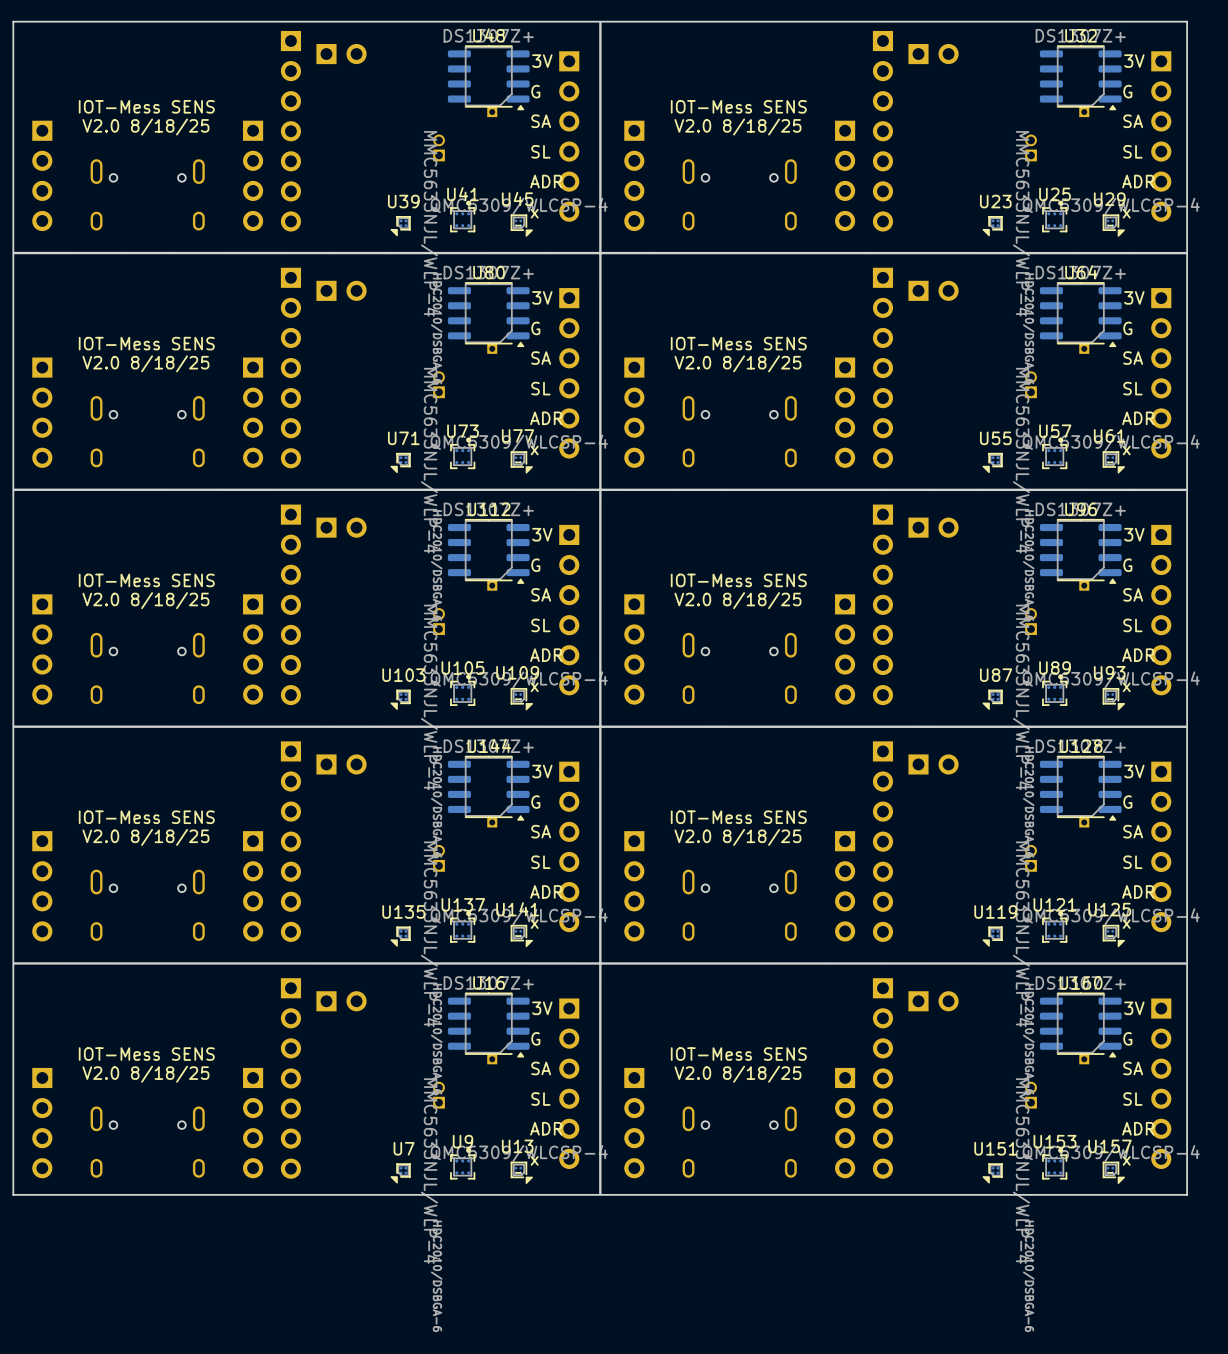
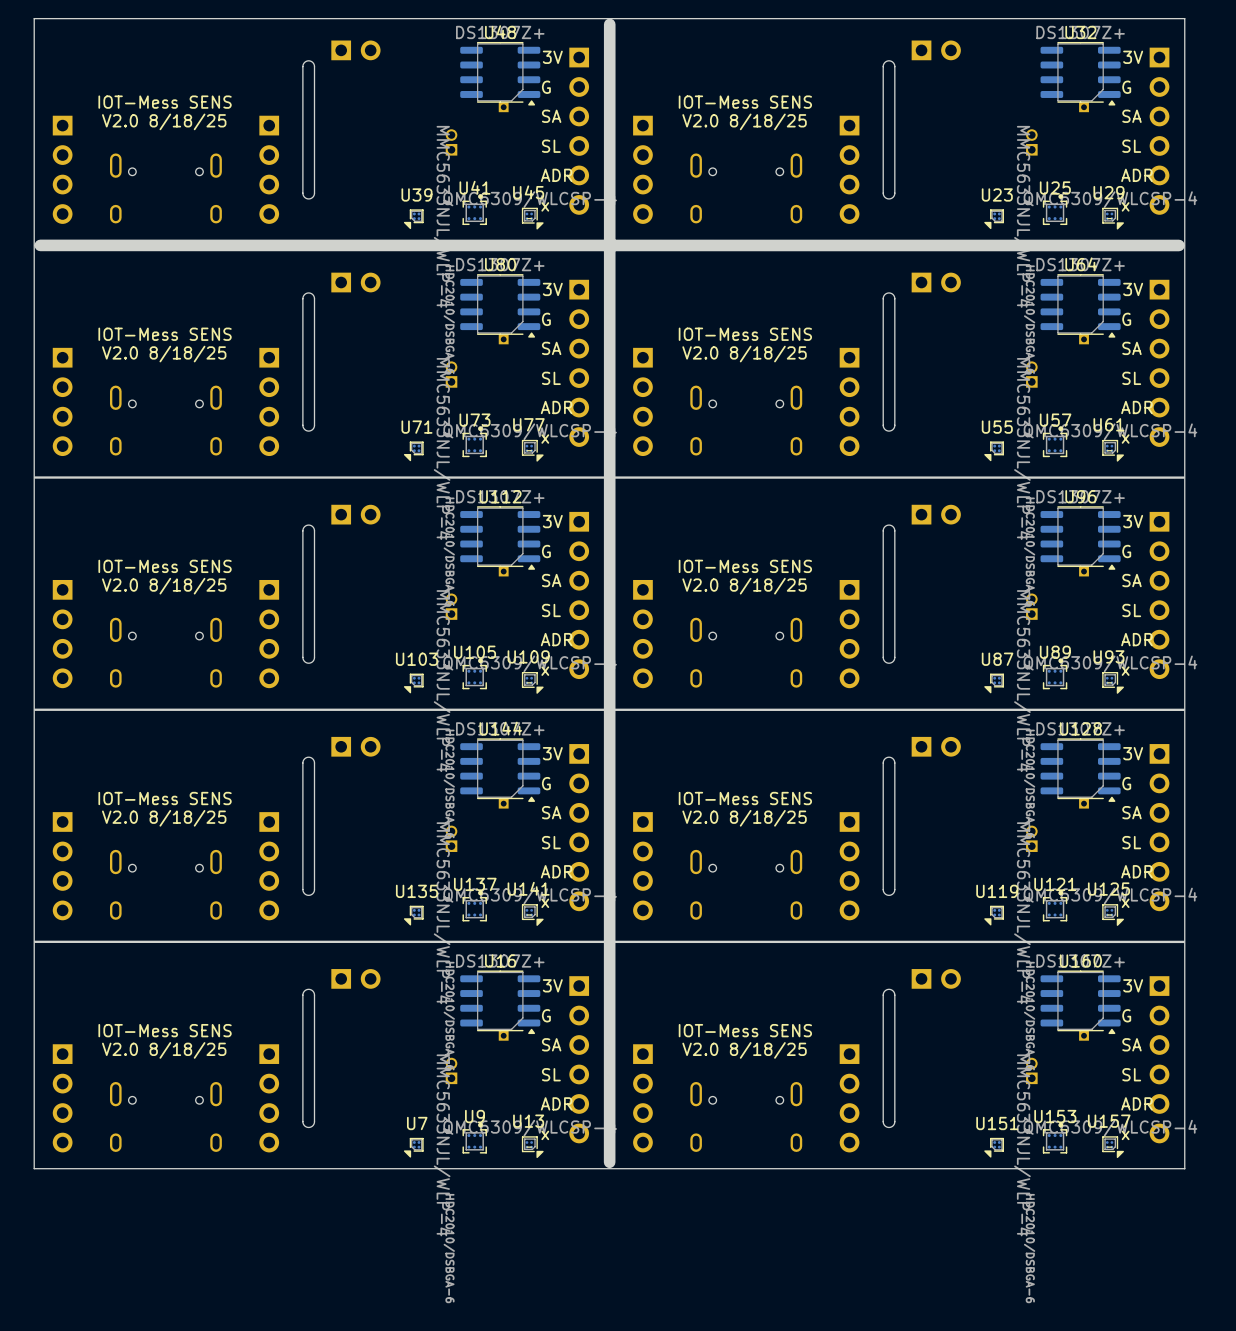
board edge width: thin (600, 22) (600, 1193) -> thick (609, 19) (609, 1167)
board edge: none -> (314, 66) (314, 193) (312, 197) (308, 198) (304, 196) (302, 193) (302, 66) (304, 62) (308, 60) (312, 62) (314, 66)
board edge: none -> (894, 66) (894, 193) (893, 197) (889, 198) (884, 197) (883, 193) (883, 66) (884, 62) (889, 60) (893, 62) (894, 66)
part: (290, 131) -> none
part: (882, 131) -> none
board edge width: thin (14, 253) (1186, 253) -> thick (35, 245) (1183, 245)
board edge: none -> (314, 298) (314, 425) (313, 429) (308, 431) (304, 429) (302, 425) (302, 298) (304, 294) (308, 292) (312, 294) (314, 298)
board edge: none -> (894, 298) (894, 425) (893, 429) (889, 431) (884, 429) (883, 425) (883, 298) (884, 294) (889, 292) (893, 294) (894, 298)
part: (290, 368) -> none
part: (882, 368) -> none
board edge: none -> (314, 530) (314, 657) (313, 661) (308, 663) (304, 661) (302, 657) (302, 530) (304, 527) (308, 525) (312, 526) (314, 530)
board edge: none -> (894, 530) (894, 657) (893, 661) (889, 663) (885, 661) (883, 657) (883, 530) (884, 526) (889, 525) (893, 526) (894, 530)
part: (290, 604) -> none
part: (882, 604) -> none
board edge: none -> (314, 763) (314, 889) (313, 893) (308, 895) (304, 893) (302, 889) (302, 763) (304, 758) (308, 757) (312, 758) (314, 763)
board edge: none -> (894, 763) (894, 889) (893, 893) (889, 895) (884, 893) (883, 889) (883, 763) (884, 758) (889, 757) (893, 758) (894, 763)
part: (290, 841) -> none
part: (882, 841) -> none
board edge: none -> (314, 995) (314, 1121) (313, 1125) (308, 1127) (304, 1125) (302, 1121) (302, 995) (304, 991) (308, 989) (312, 990) (314, 995)
board edge: none -> (894, 995) (894, 1121) (893, 1125) (889, 1127) (884, 1125) (883, 1121) (883, 995) (884, 991) (889, 989) (893, 991) (894, 995)
part: (290, 1078) -> none
part: (882, 1078) -> none

